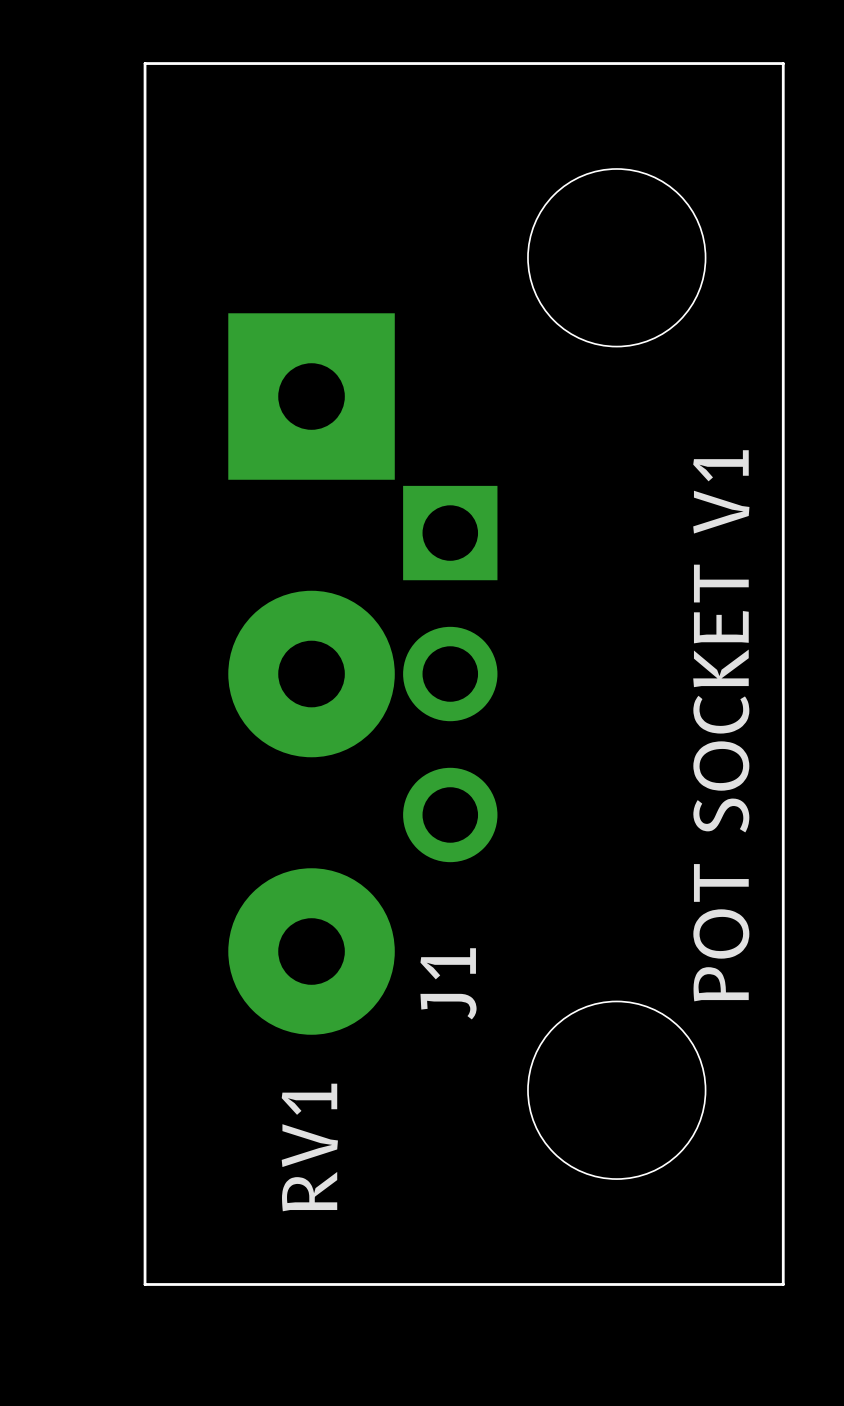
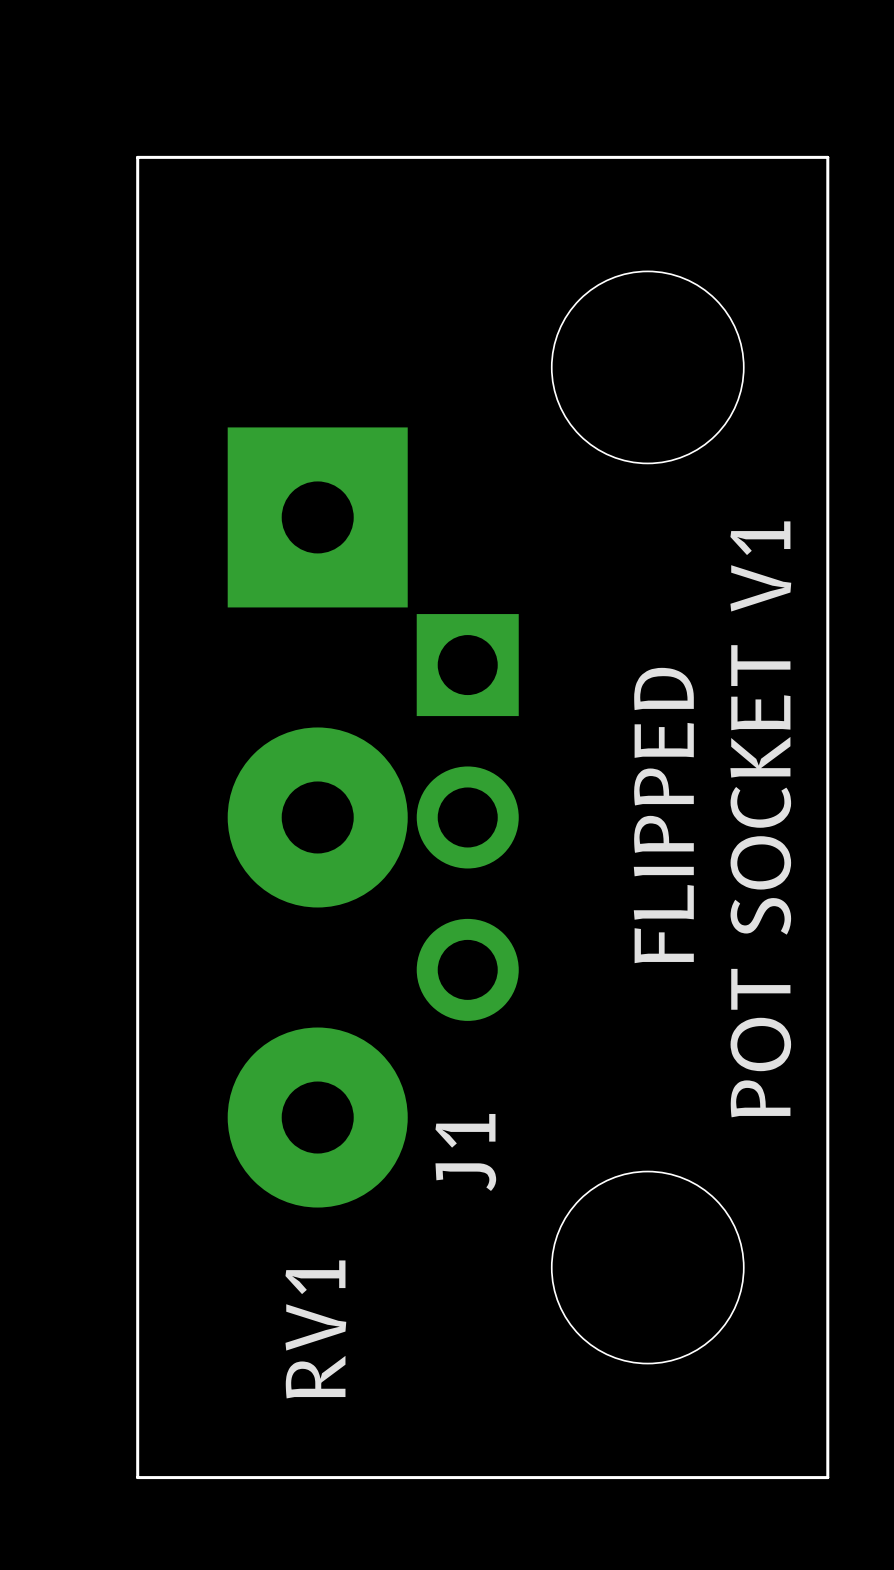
text: none -> FLIPPED (663, 815)
text position: POT SOCKET V1 (721, 725) -> POT SOCKET V1 (760, 819)

